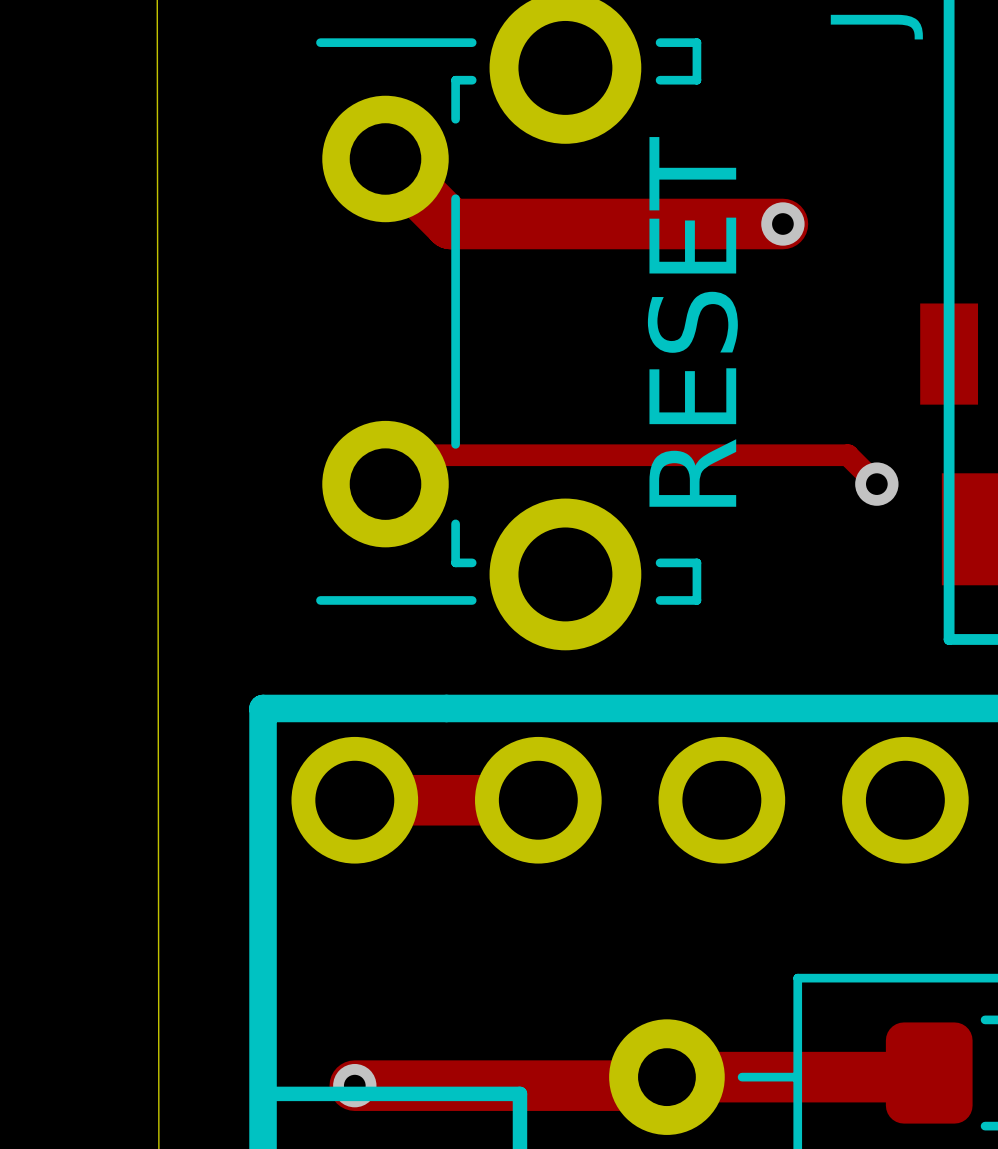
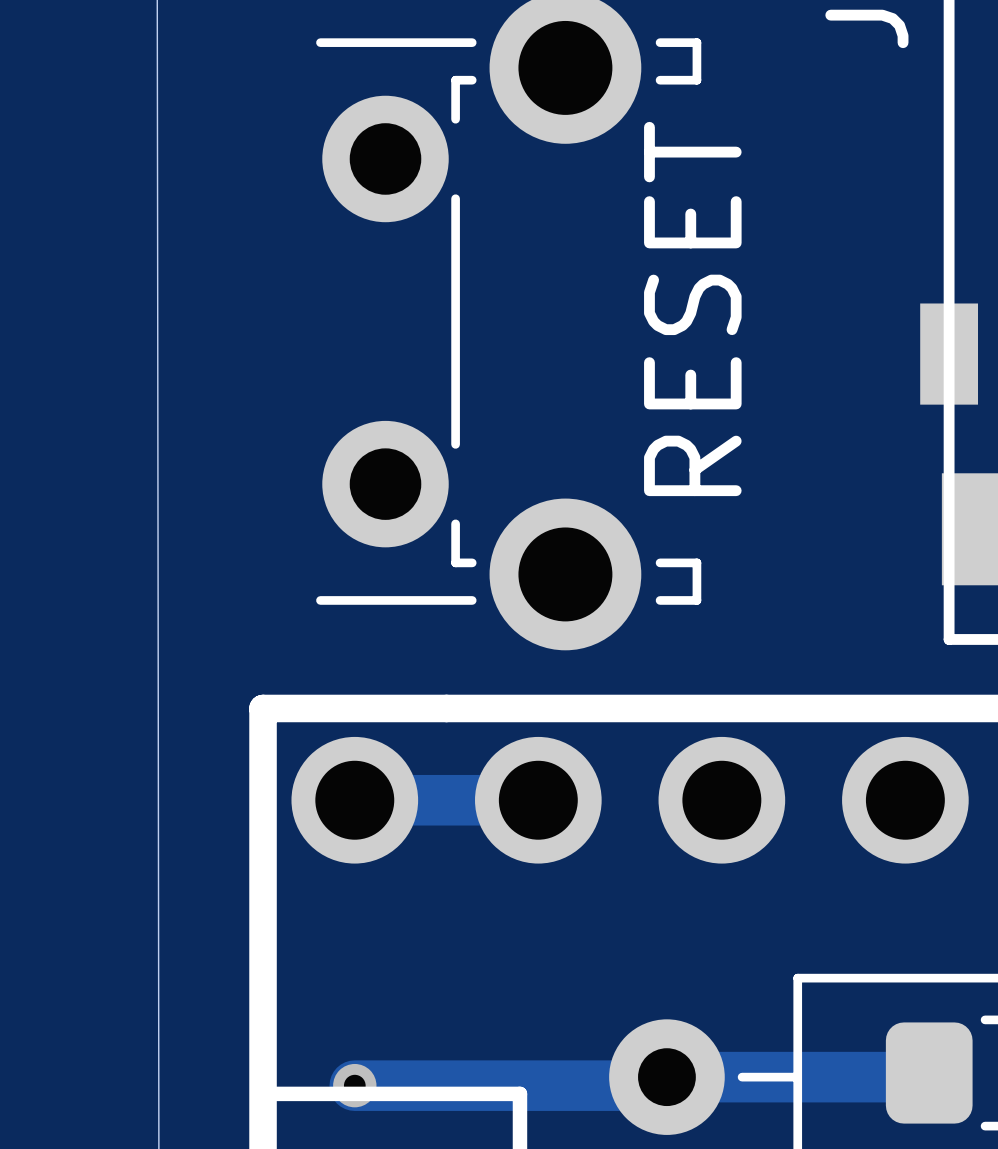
track: (385, 158) (450, 224) (782, 224) -> none
via: (782, 224) -> none
track: (385, 484) (414, 455) (847, 455) (876, 484) -> none
via: (876, 484) -> none

